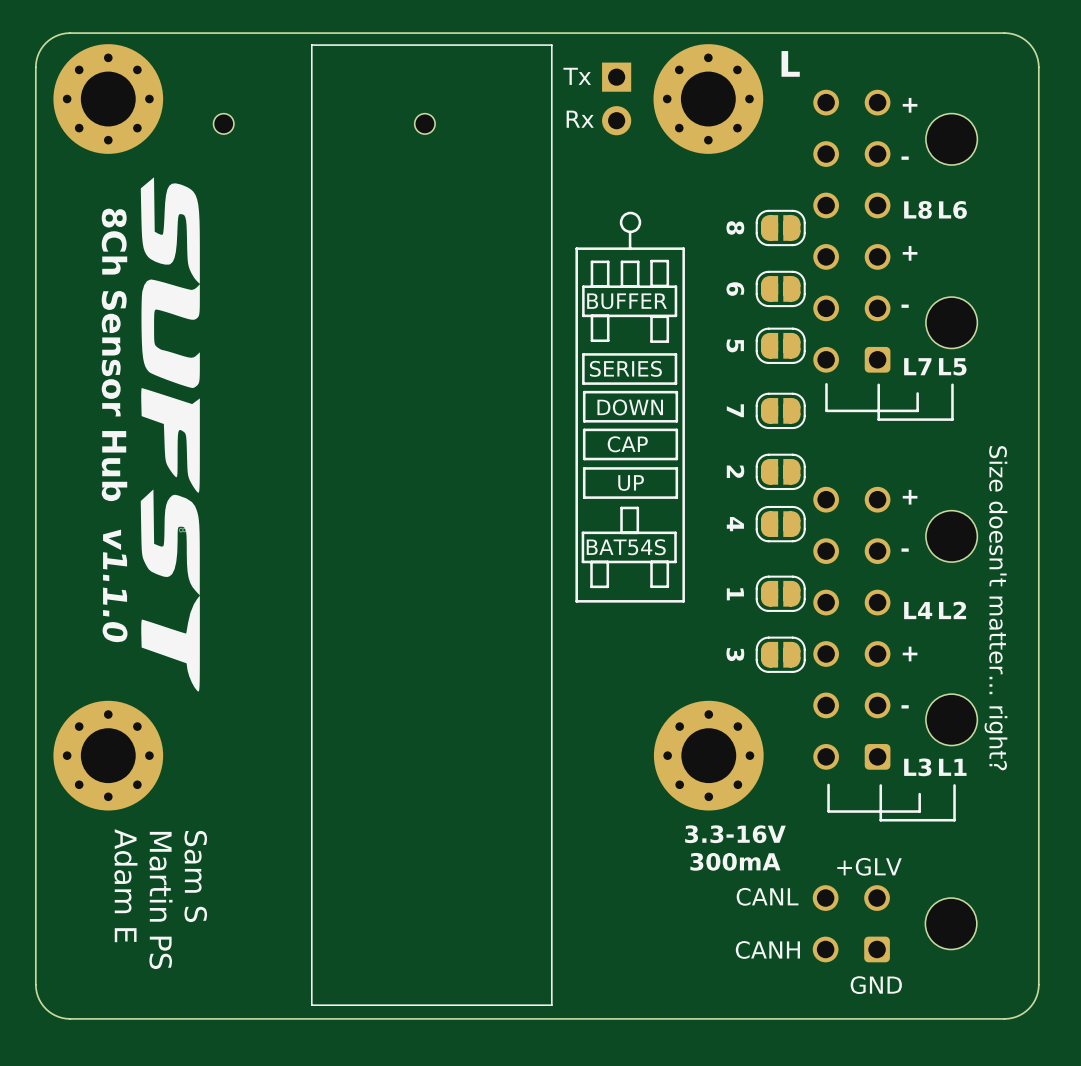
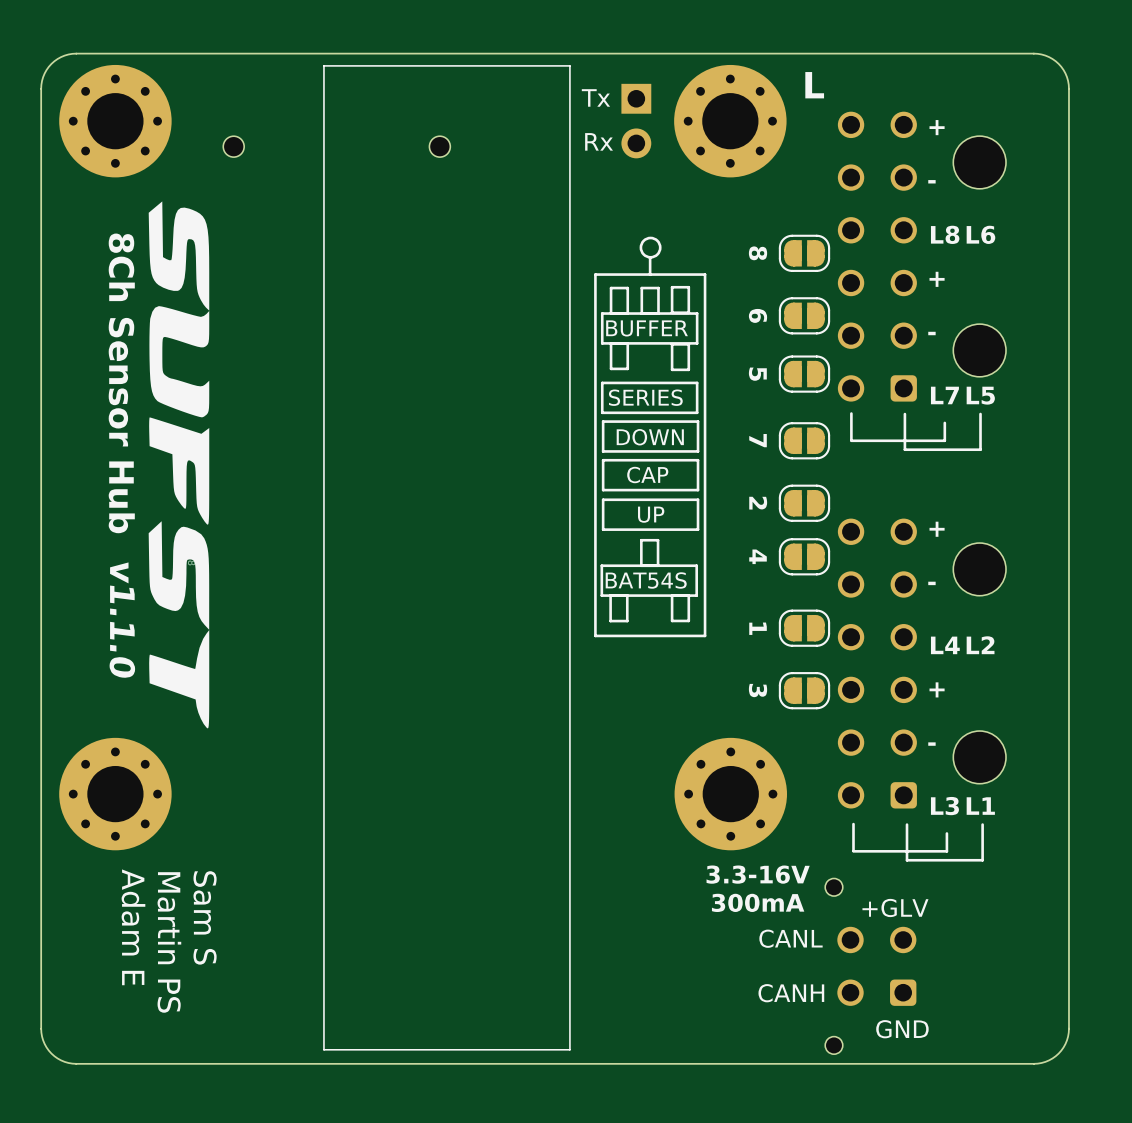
text: Size doesn't matter... right? (995, 608) -> none
part: none -> (870, 966)
part: (894, 923) -> none

